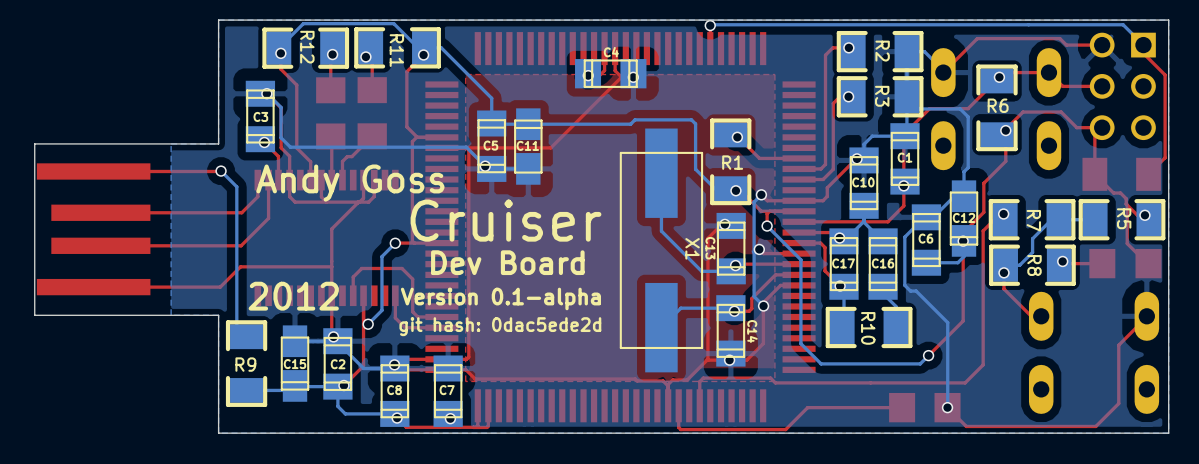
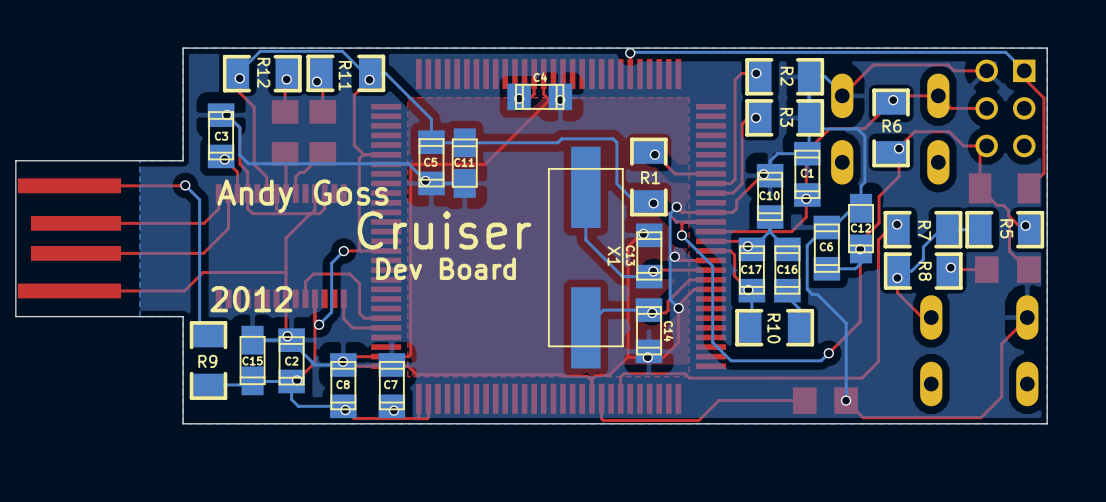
text: Version 0.1-alpha (500, 298) -> none
text: git hash: 0dac5ede2d (500, 326) -> none

